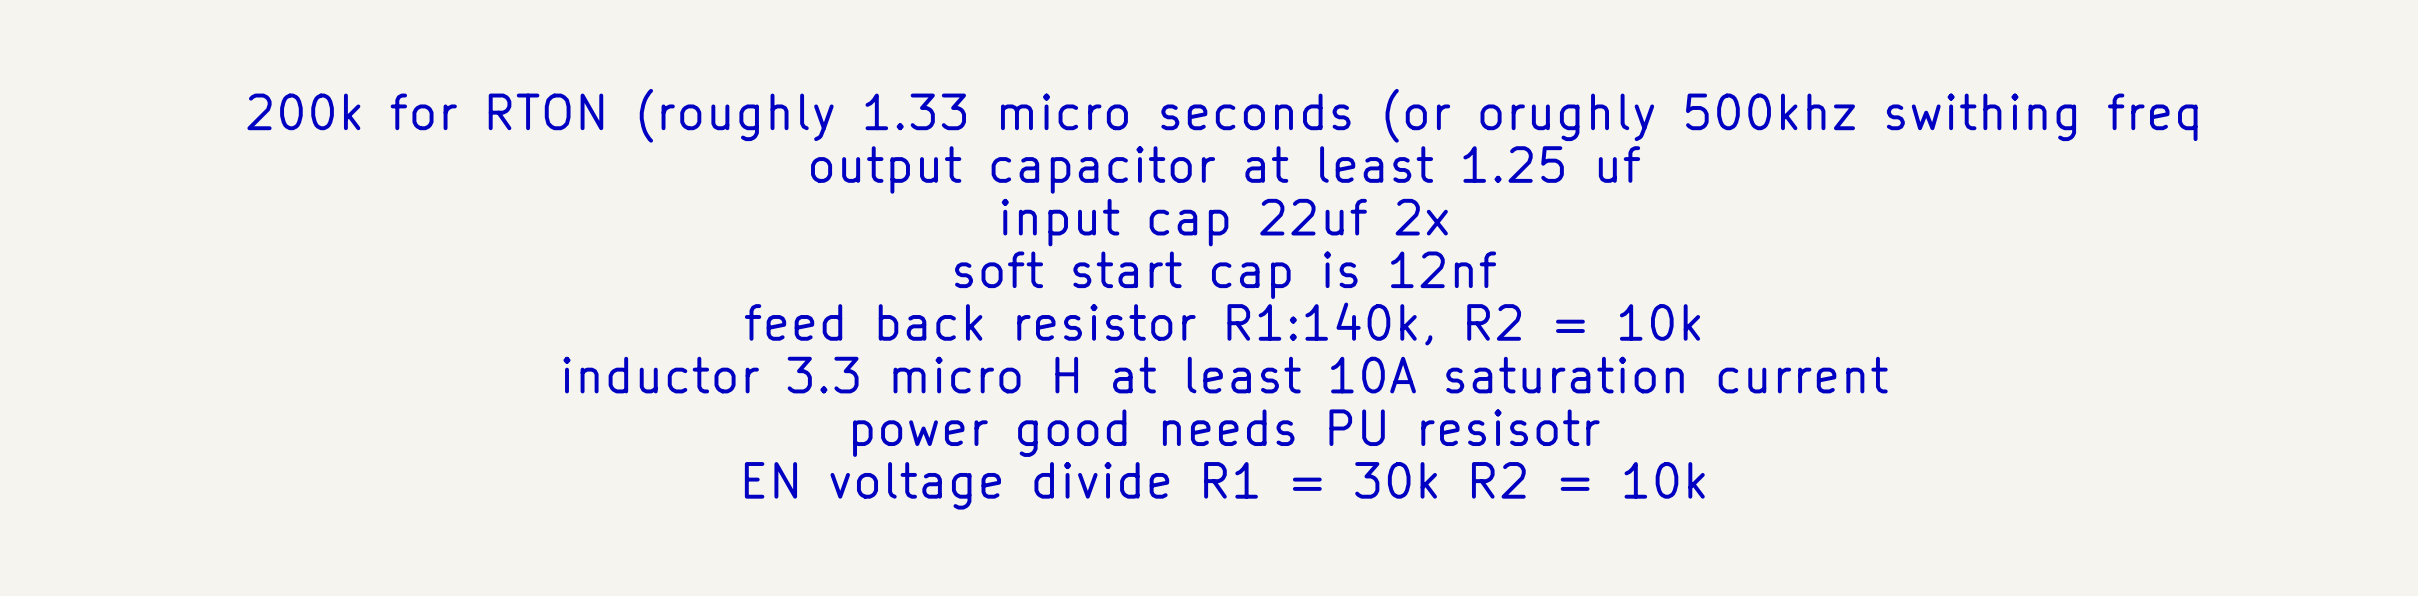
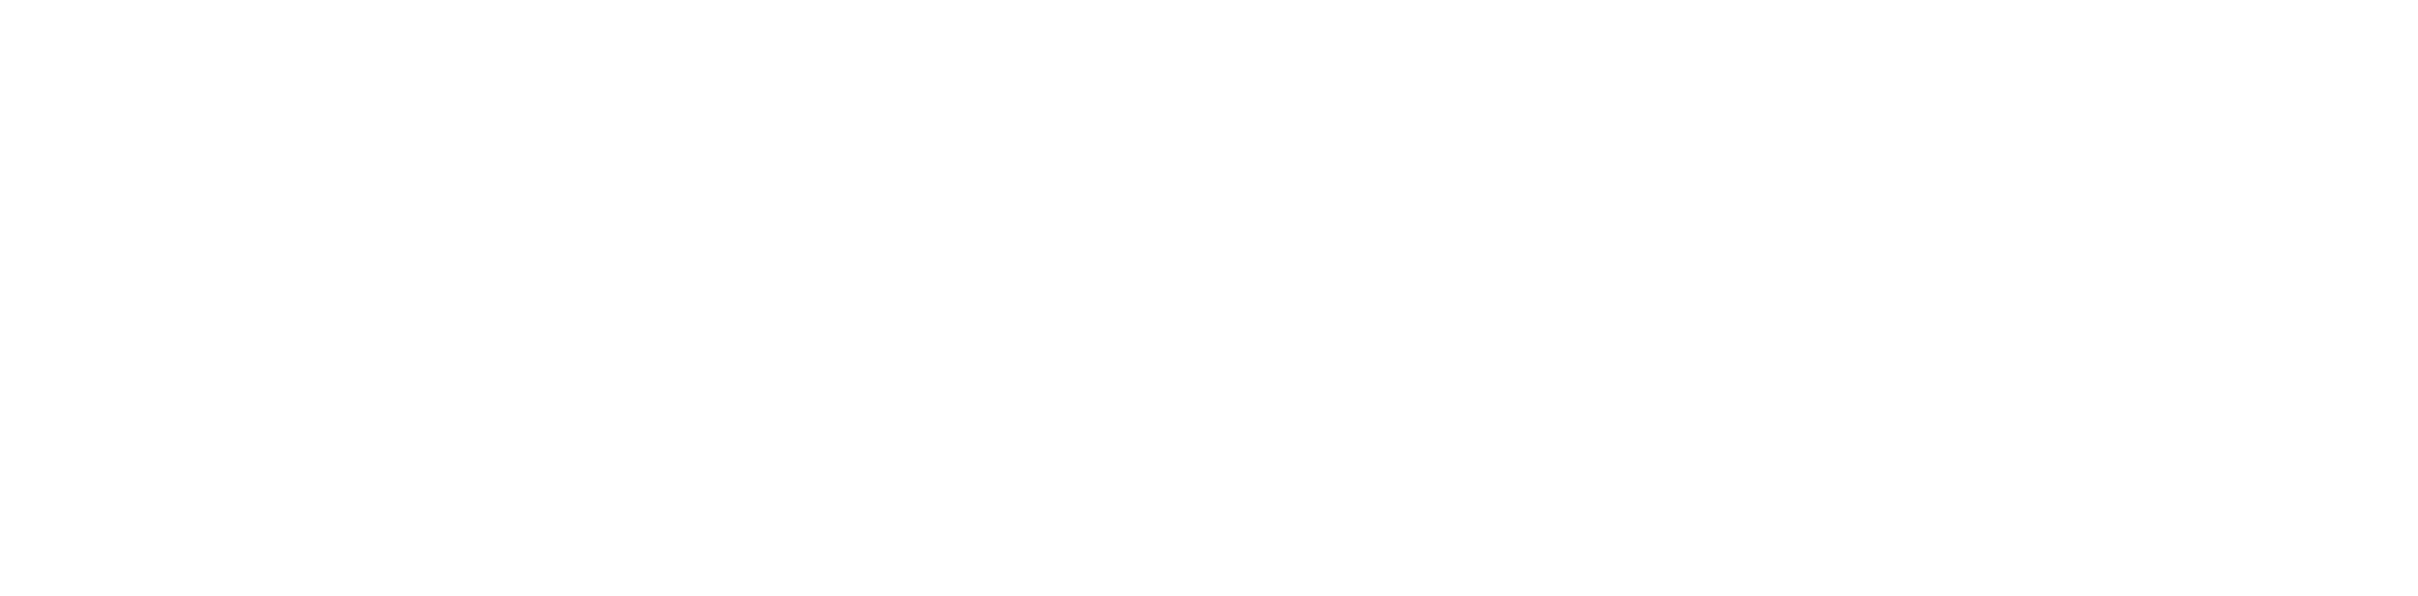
text: 200k for RTON (roughly 1.33 micro seconds (or orughly 500khz swithing freq (1222, 115) -> none
text: output capacitor at least 1.25 uf (1225, 169) -> none
text: input cap 22uf 2x (1224, 222) -> none
text: soft start cap is 12nf (1225, 275) -> none
text: feed back resistor R1:140k, R2 = 10k (1222, 324) -> none
text: inductor 3.3 micro H at least 10A saturation current (1225, 375) -> none
text: power good needs PU resisotr (1226, 433) -> none
text: EN voltage divide R1 = 30k R2 = 10k (1224, 485) -> none

